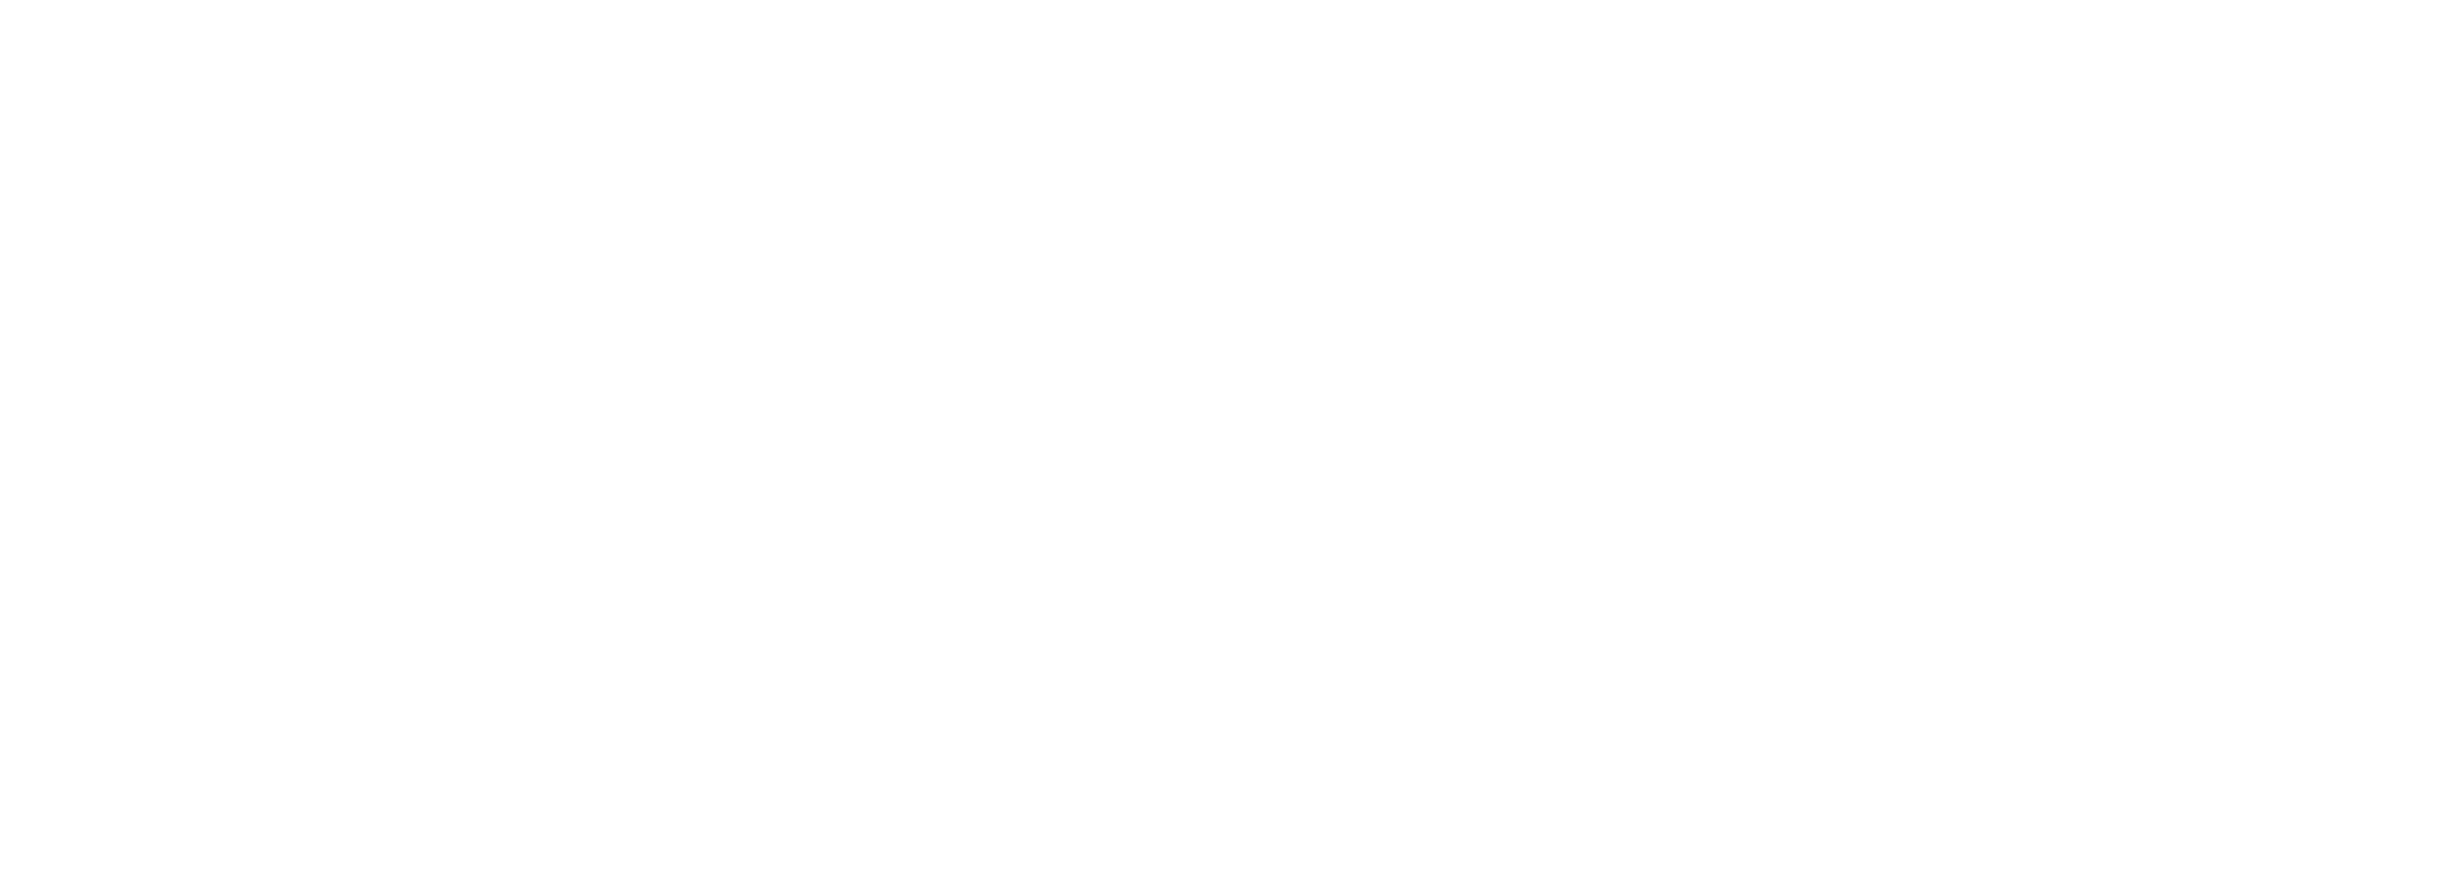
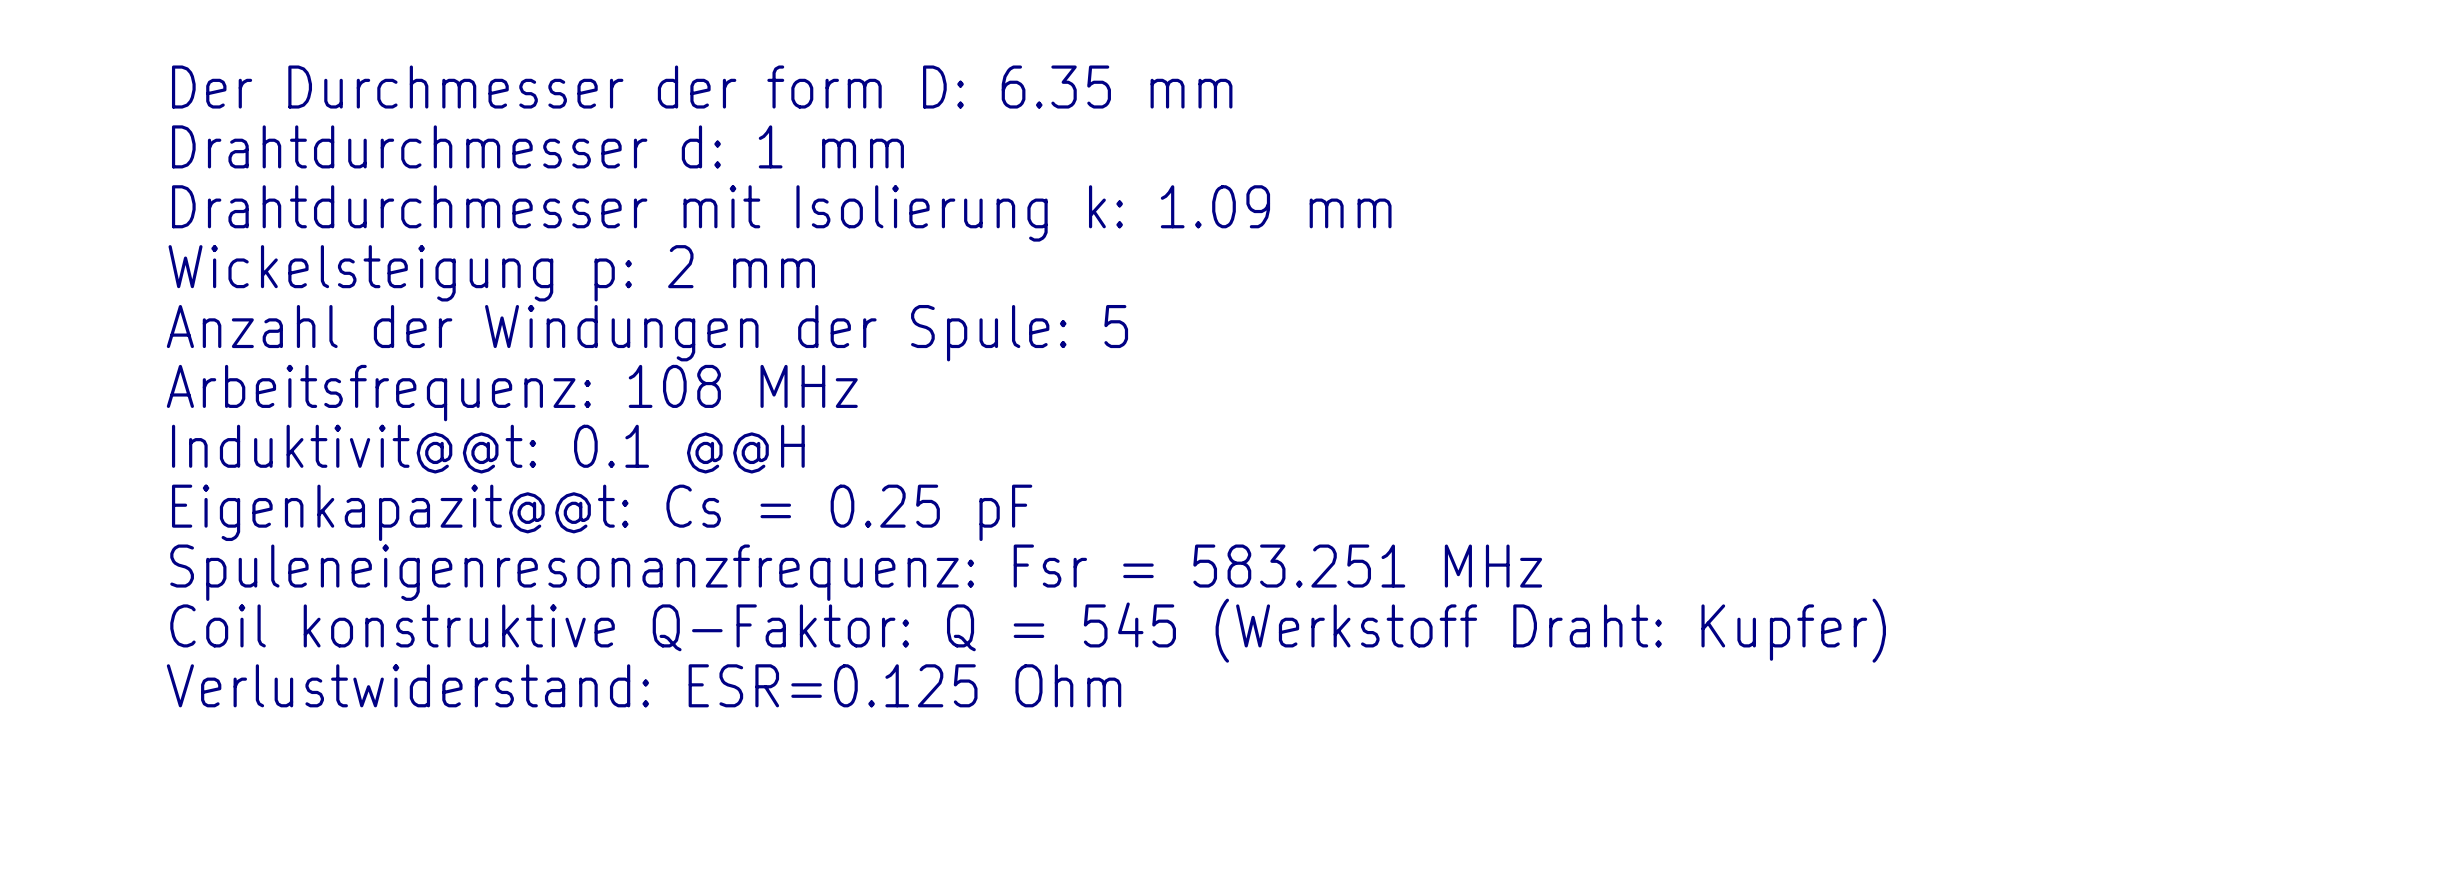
text: none -> Der Durchmesser der form D: 6.35 mm (702, 87)
text: none -> Drahtdurchmesser d: 1 mm (537, 146)
text: none -> Drahtdurchmesser mit Isolierung k: 1.09 mm (781, 213)
text: none -> Wickelsteigung p: 2 mm (491, 273)
text: none -> Anzahl der Windungen der Spule: 5 (647, 333)
text: none -> Arbeitsfrequenz: 108 MHz (512, 393)
text: none -> Induktivit@@t: 0.1 @@H (488, 449)
text: none -> Eigenkapazit@@t: Cs = 0.25 pF (602, 512)
text: none -> Spuleneigenresonanzfrequenz: Fsr = 583.251 MHz (856, 572)
text: none -> Coil konstruktive Q-Faktor: Q = 545 (Werkstoff Draht: Kupfer) (1028, 630)
text: none -> Verlustwiderstand: ESR=0.125 Ohm (644, 685)

